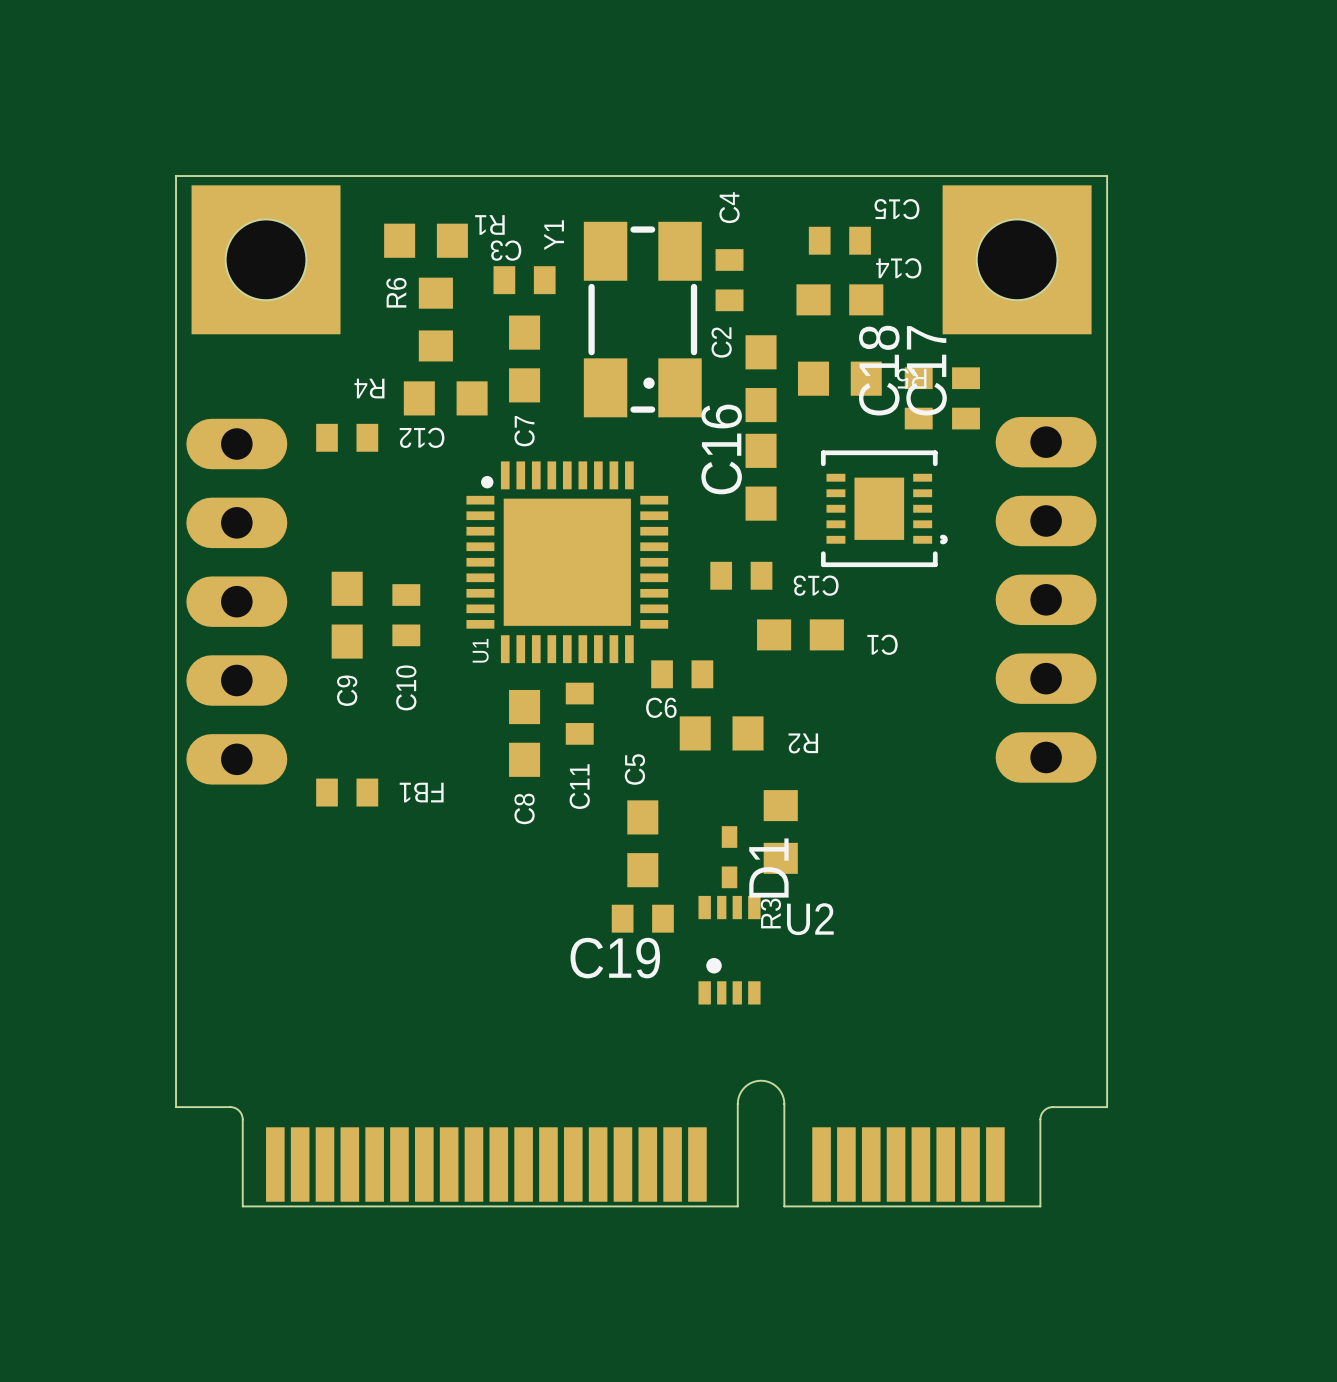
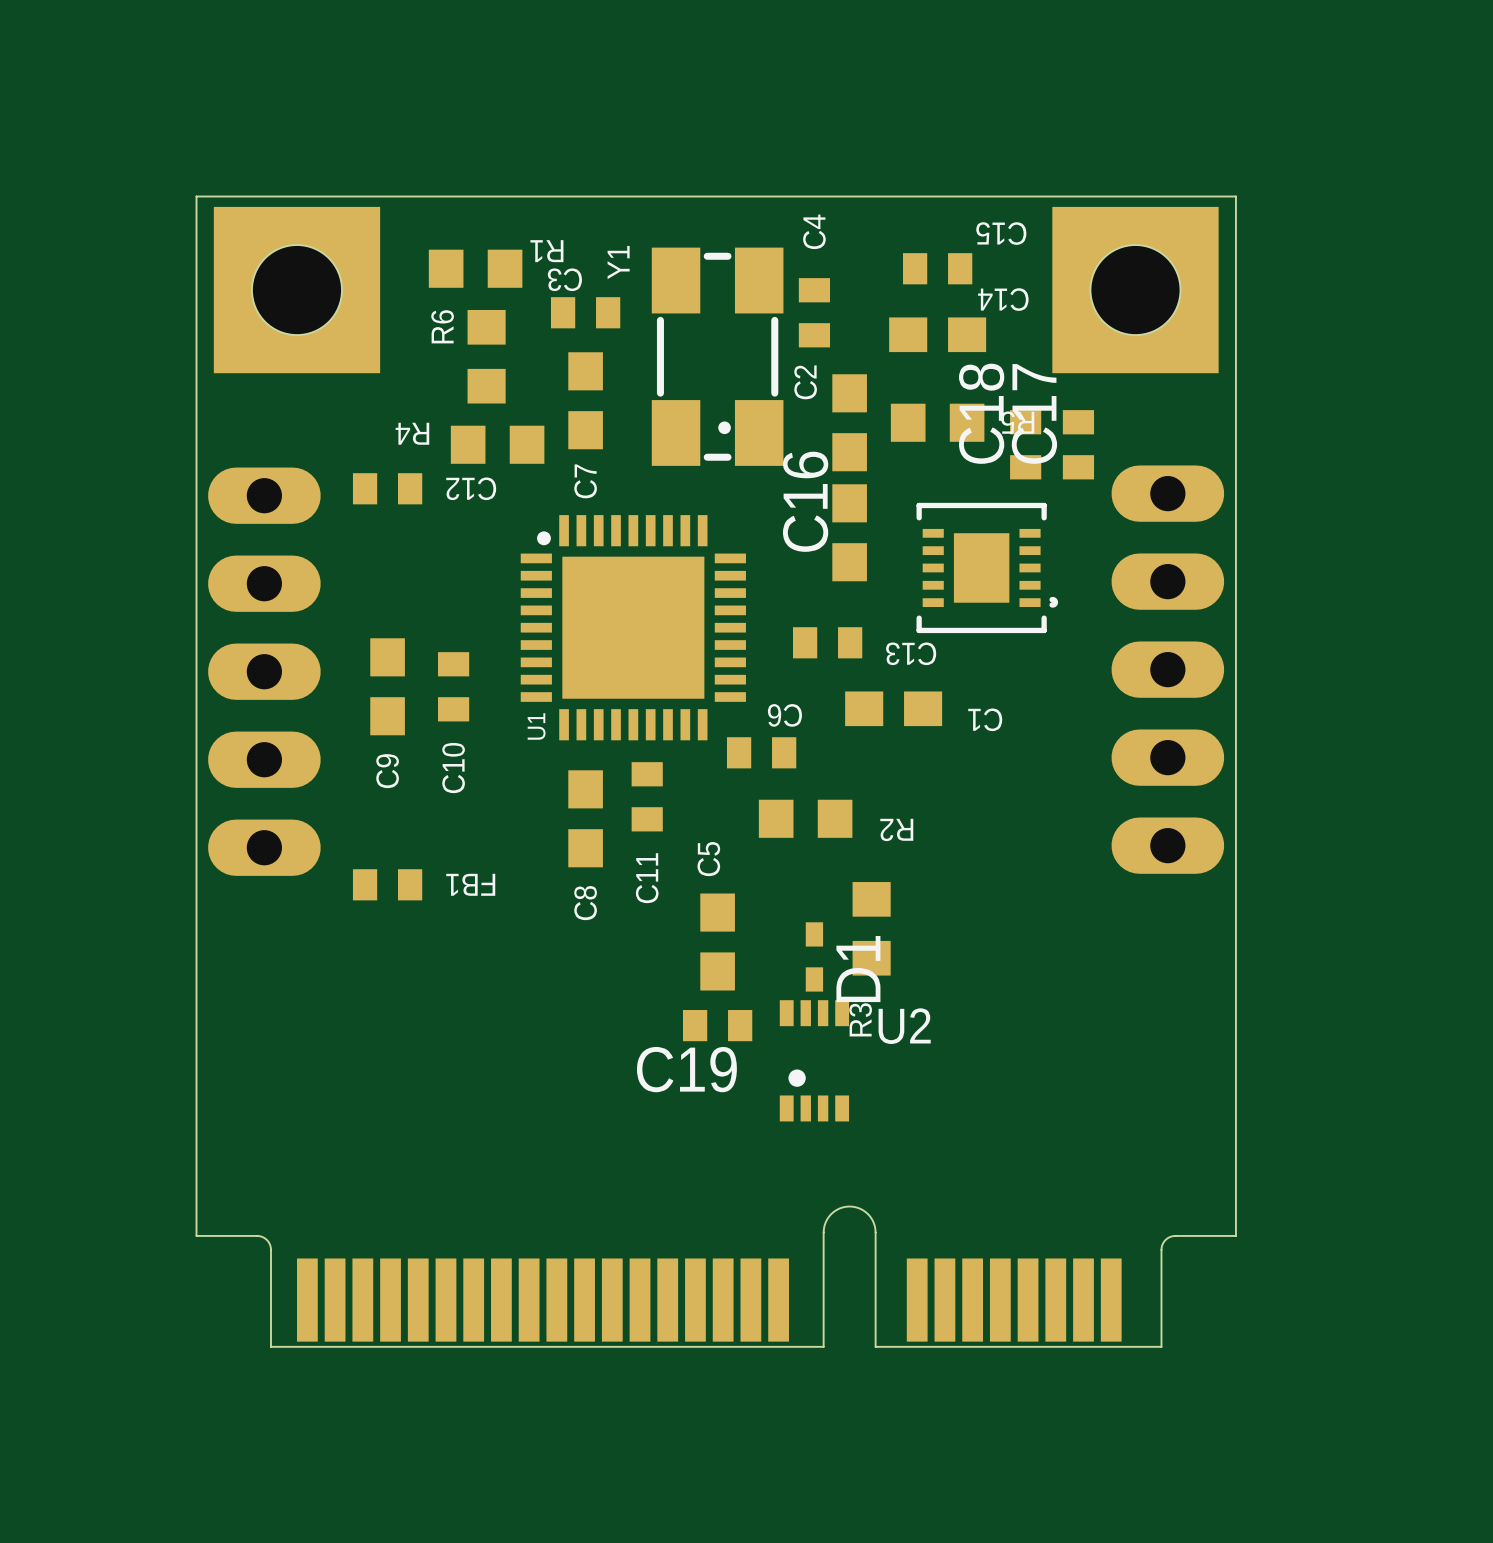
C6 name rotation: 0° (661, 707) -> 180° (784, 715)
C6 name position: C6 (661, 707) -> C6 (784, 715)

